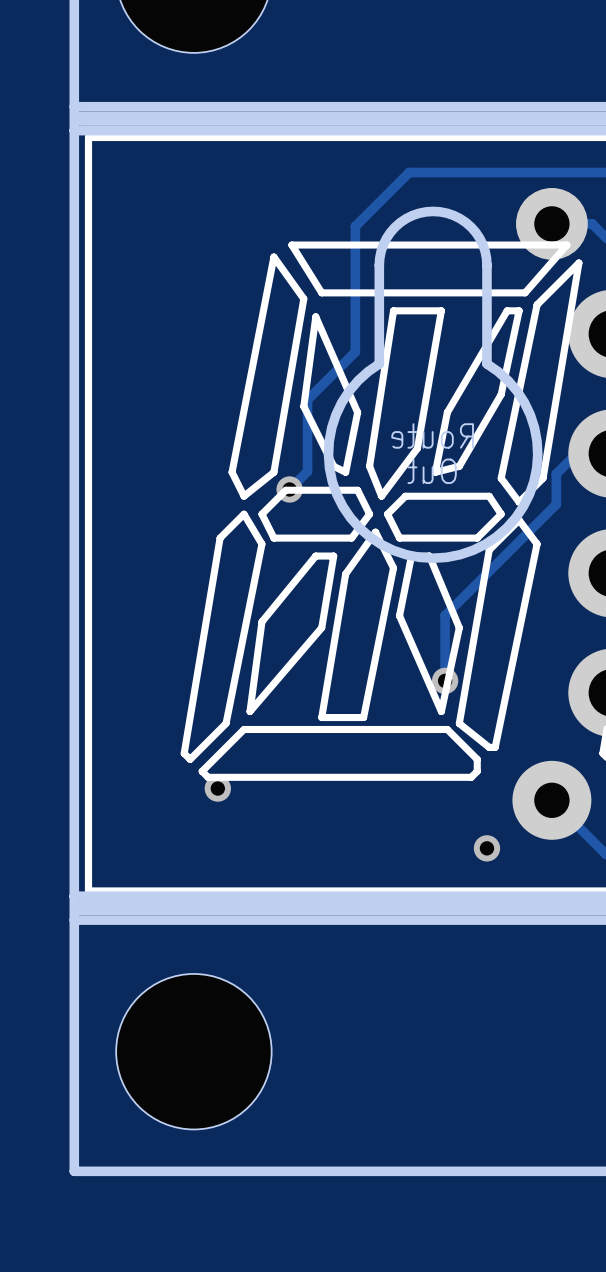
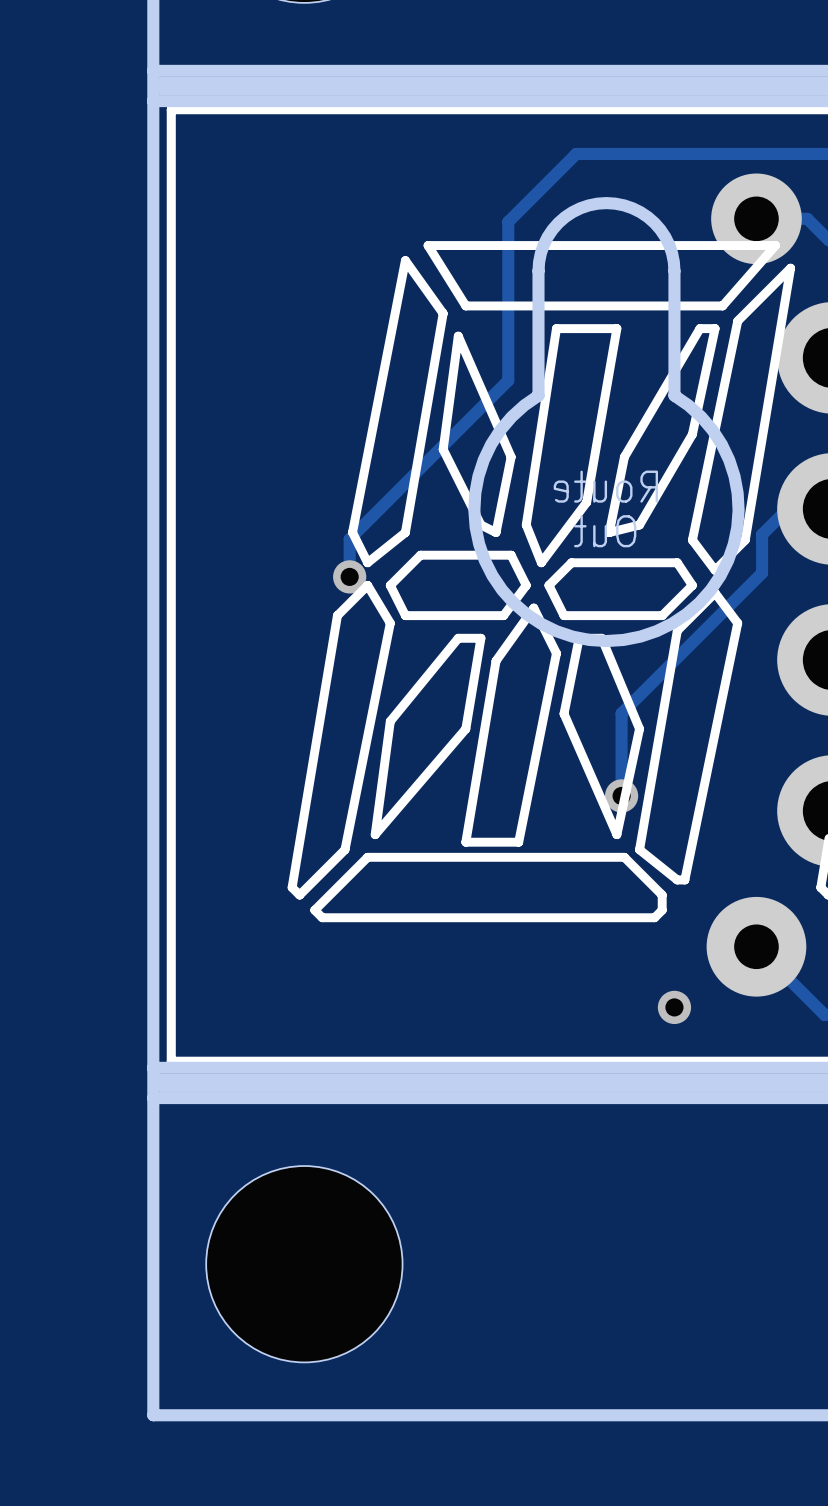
track: (307, 399) (307, 471) (289, 489) -> (447, 440) (349, 539) (349, 576)
via position: (289, 489) -> (349, 576)
via: (217, 788) -> none

